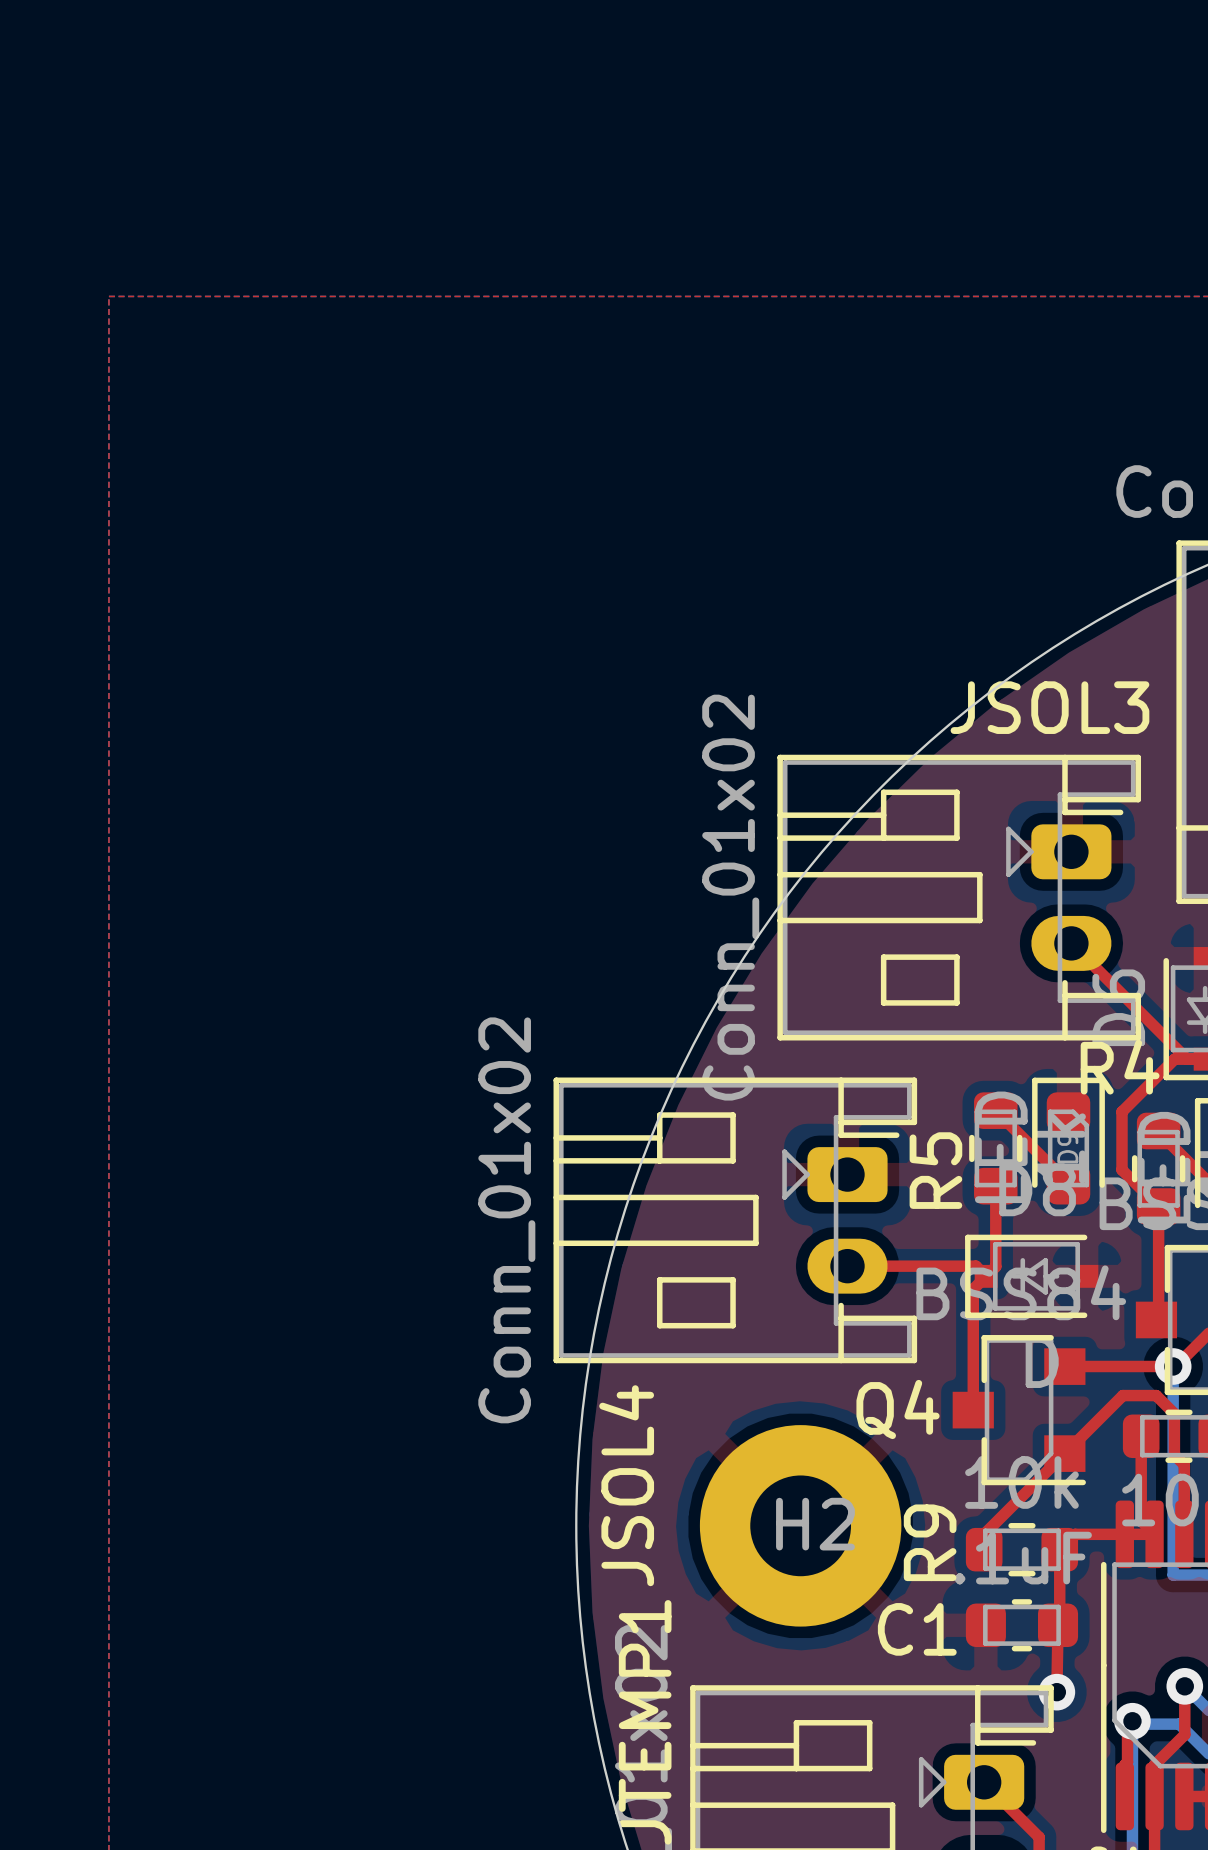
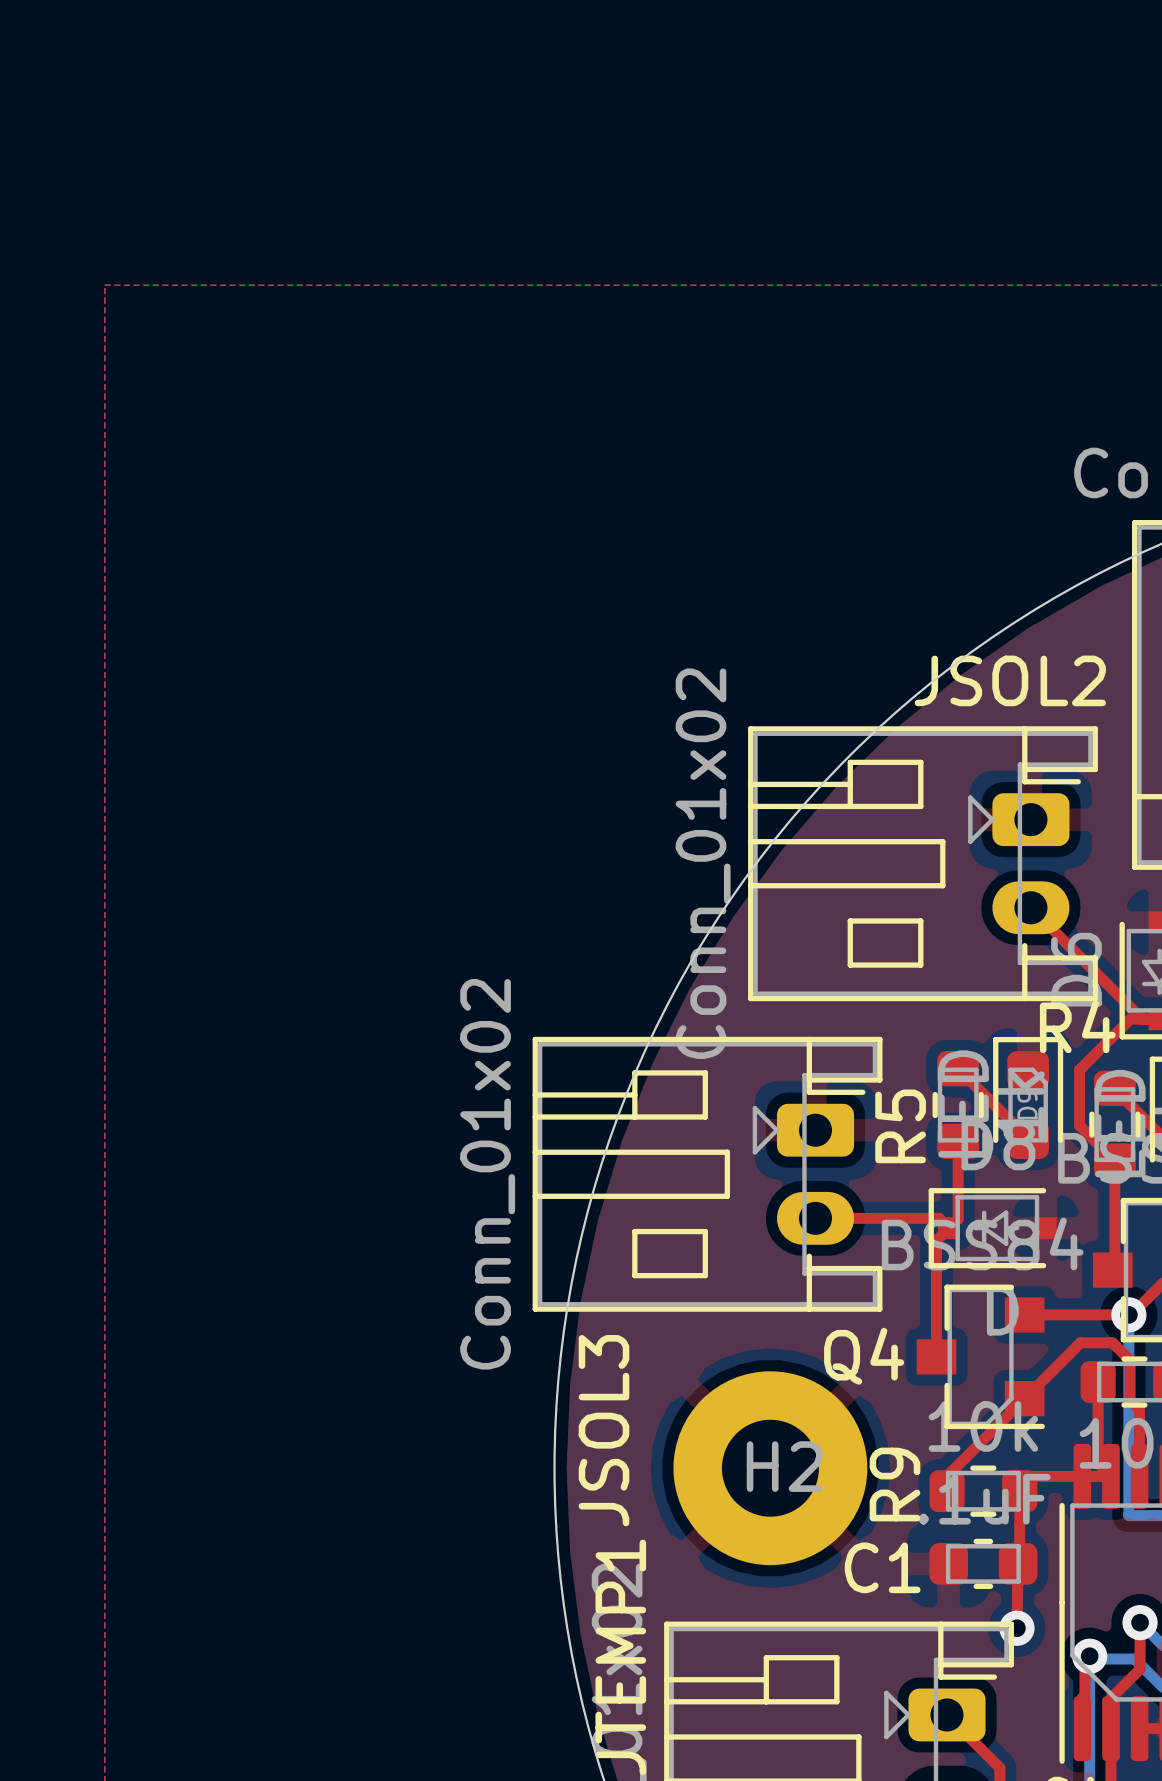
JSOL3 name: JSOL3 (1049, 707) -> JSOL2 (1010, 680)
JSOL4 name: JSOL4 (626, 1485) -> JSOL3 (604, 1430)

